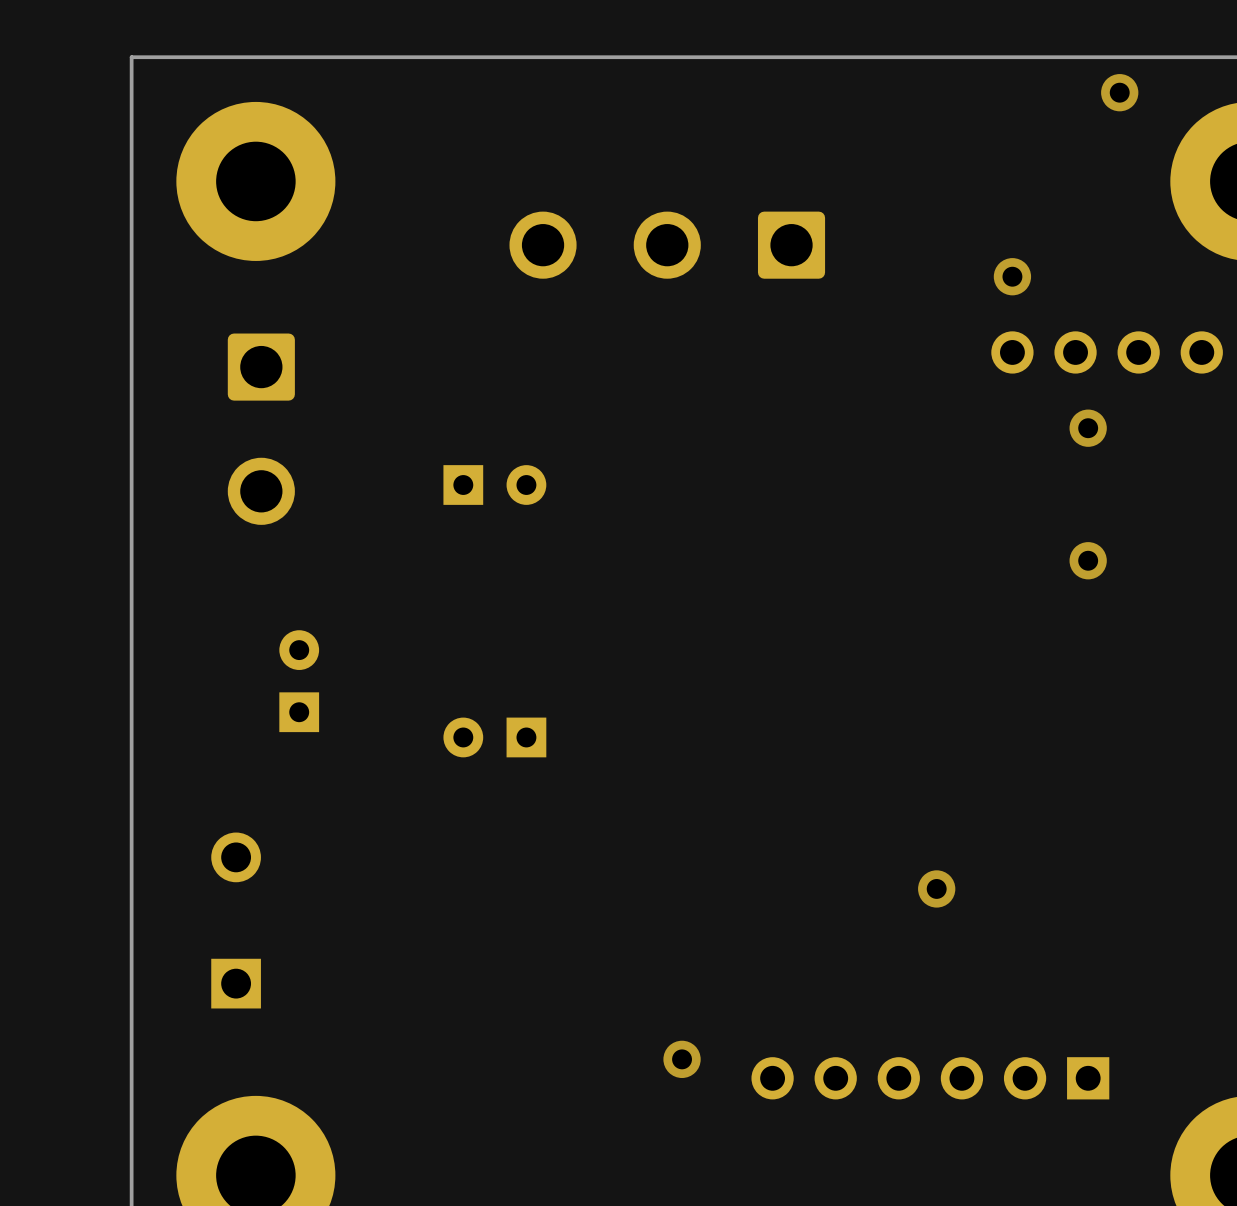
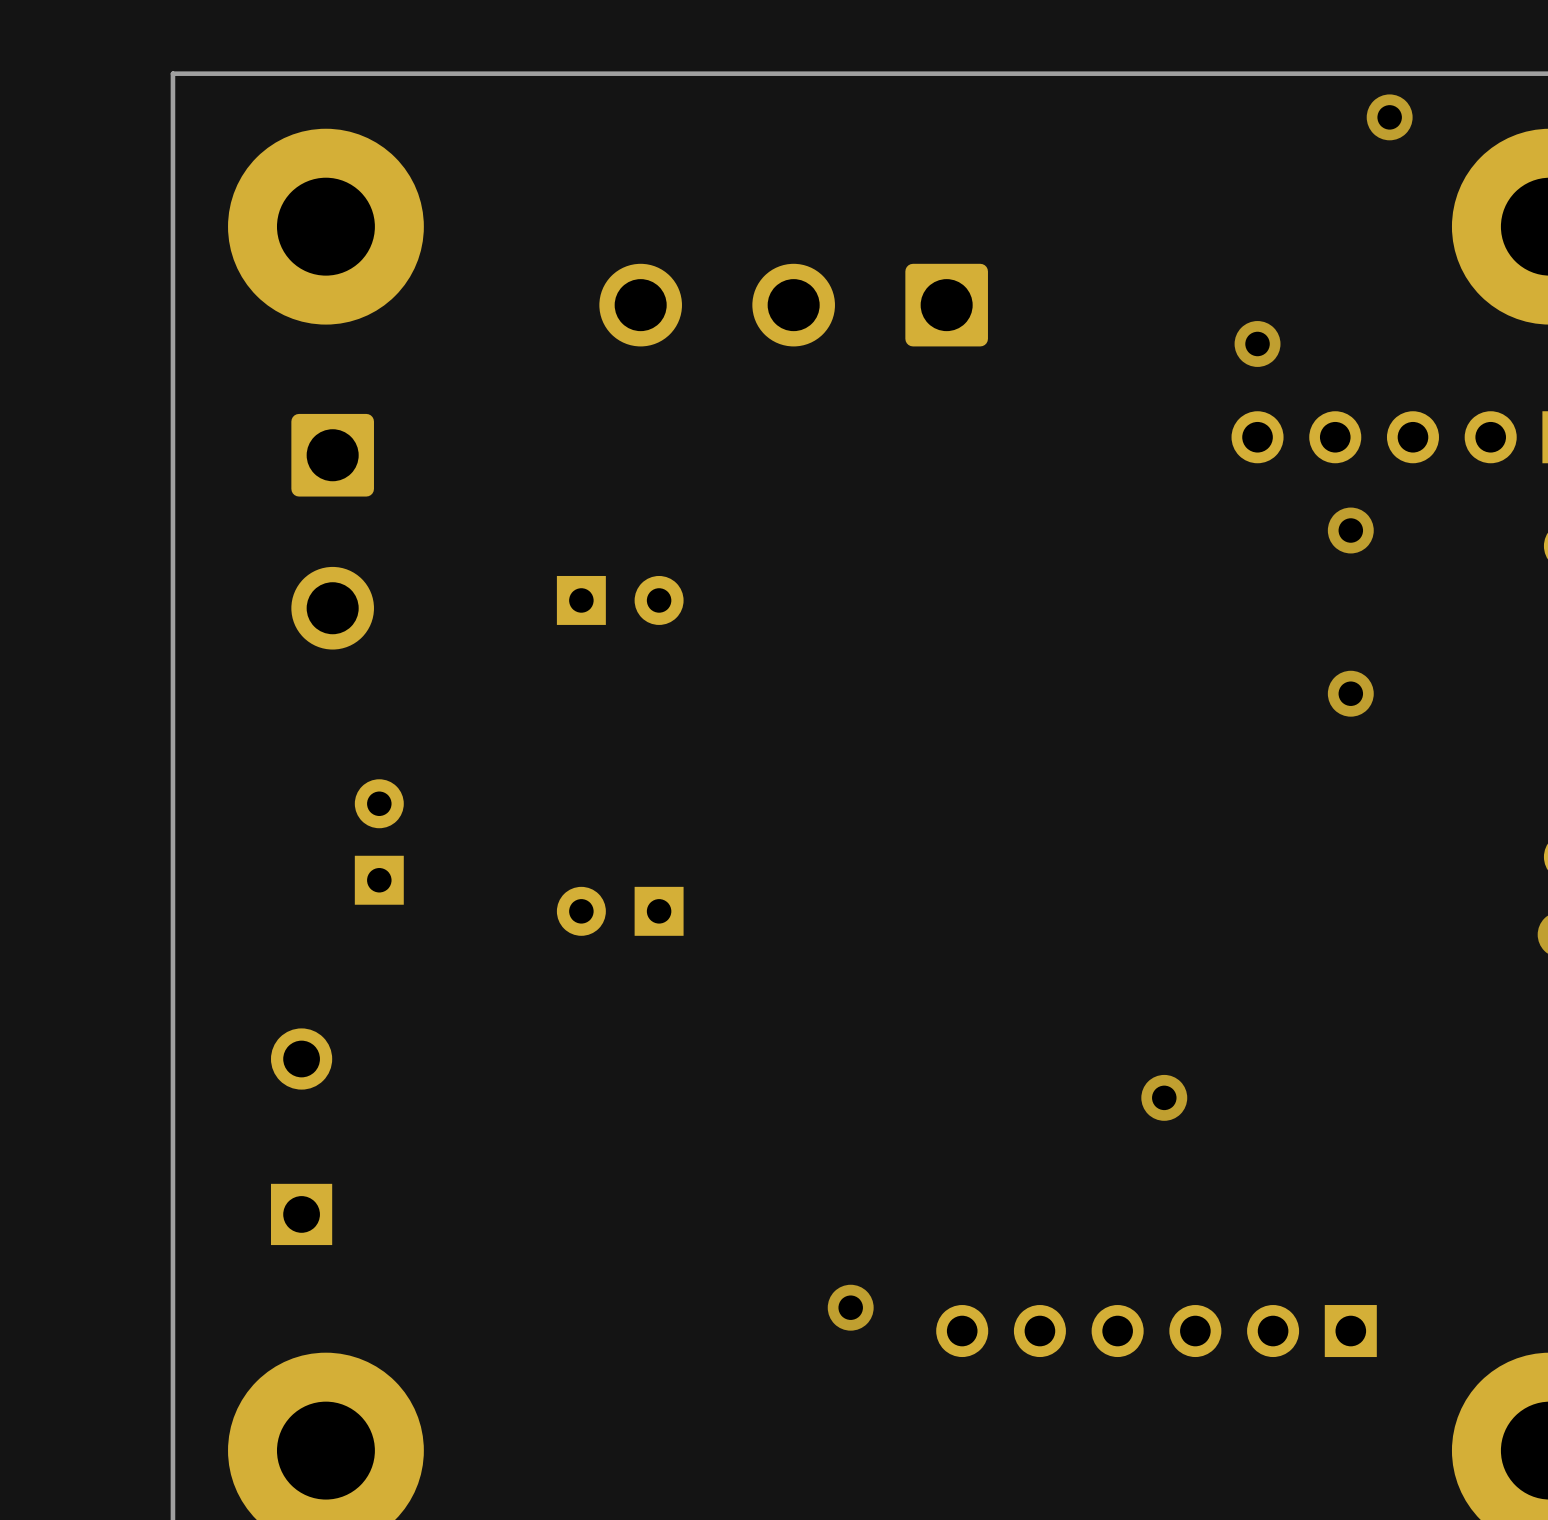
part position: (667, 245) -> (793, 305)

